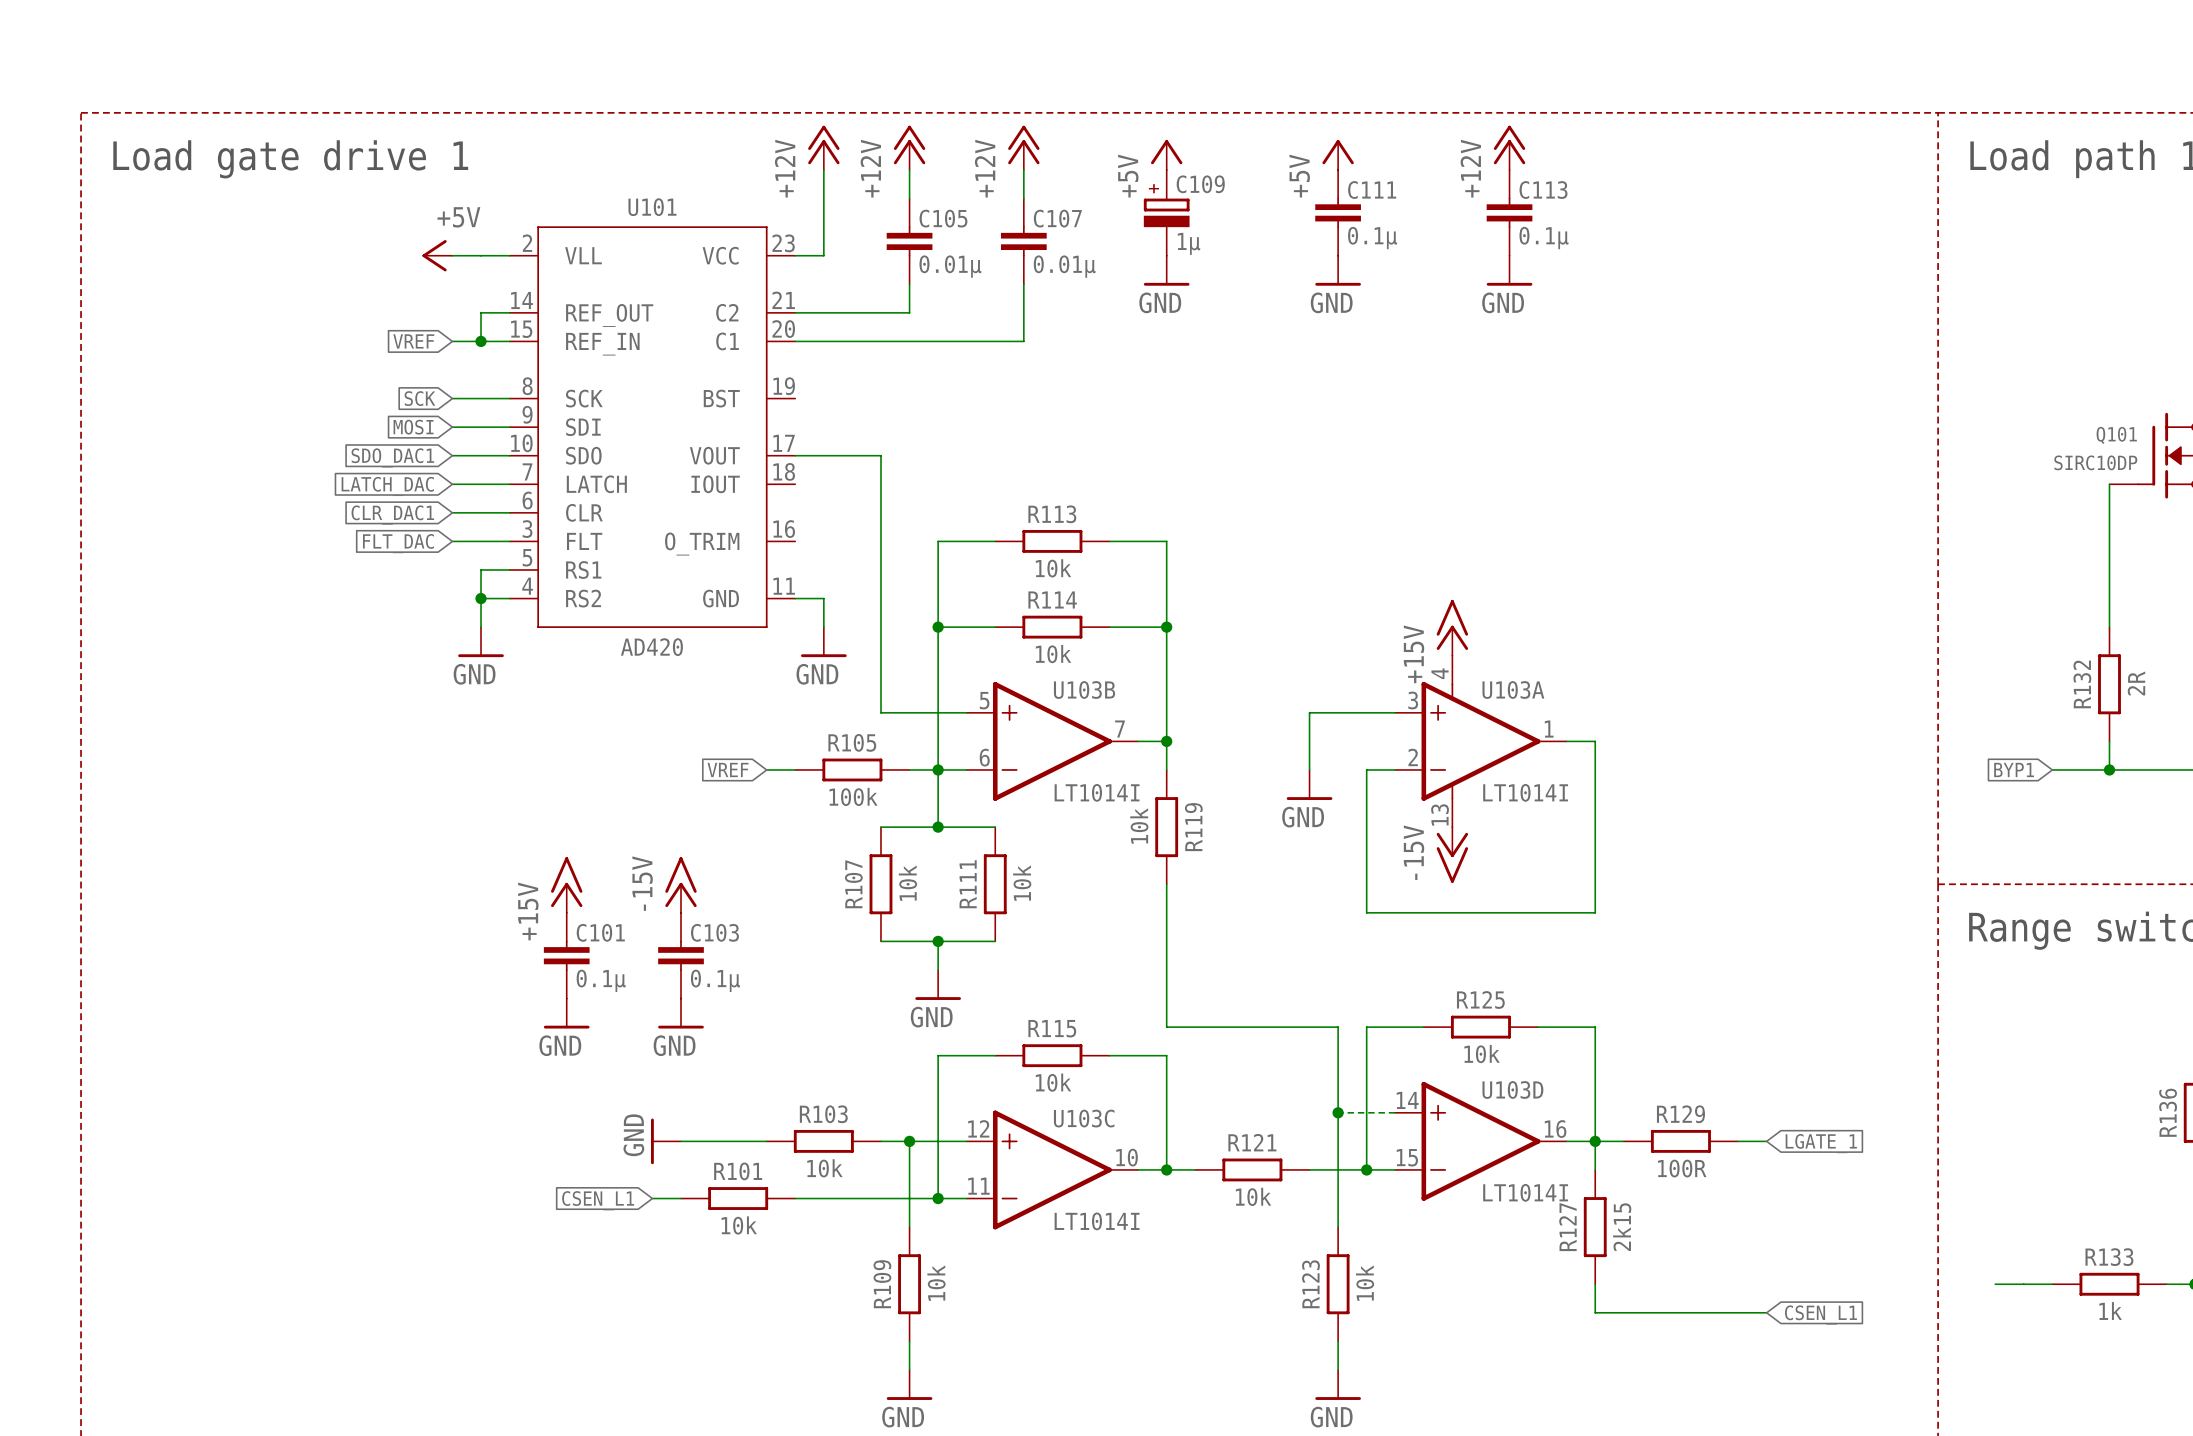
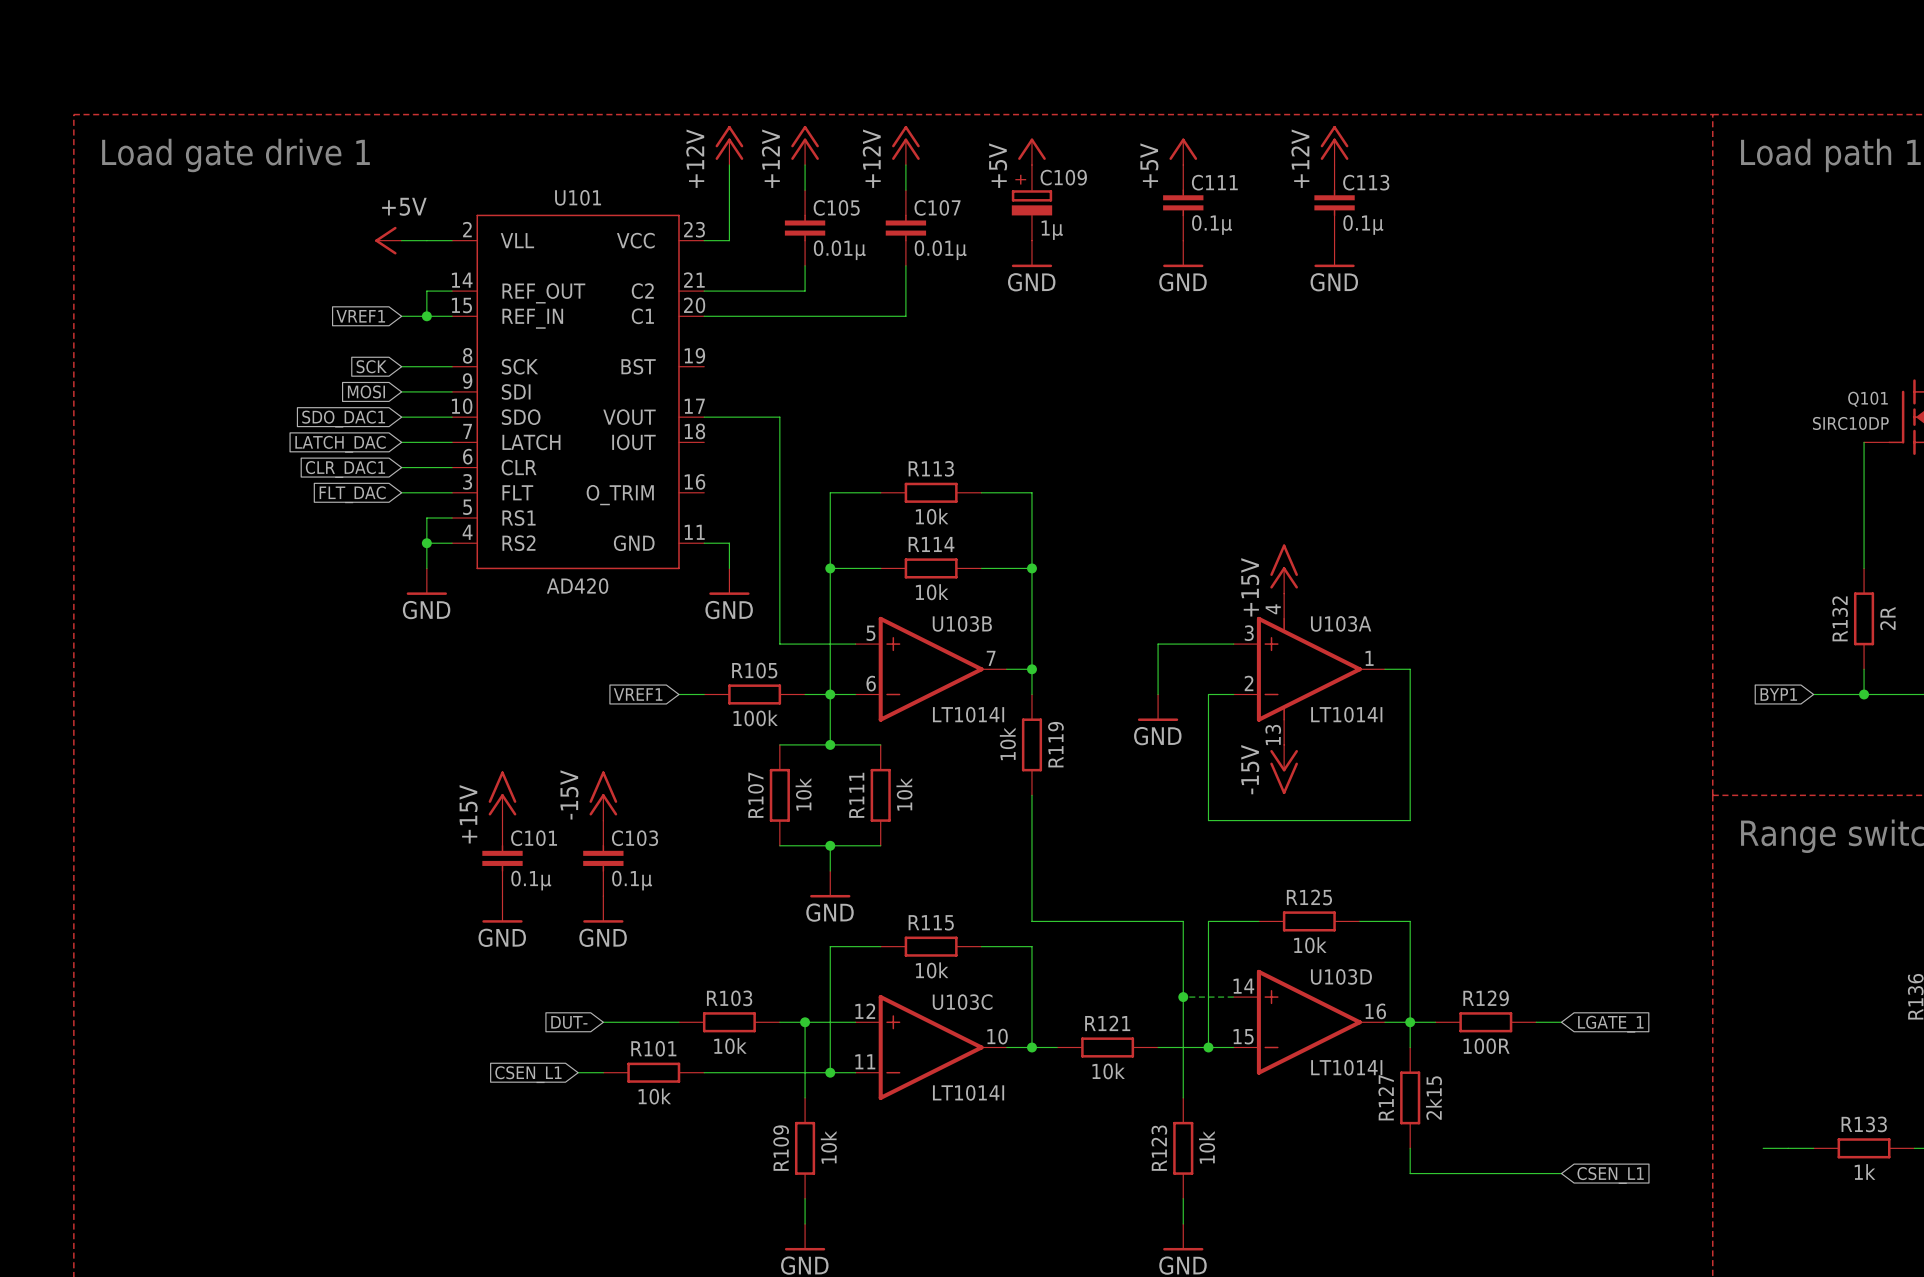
global label: VREF (413, 341) -> VREF1 (360, 316)
global label: VREF (728, 769) -> VREF1 (638, 694)
global label: none -> DUT- (569, 1022)
power symbol: GND (666, 1141) -> none

